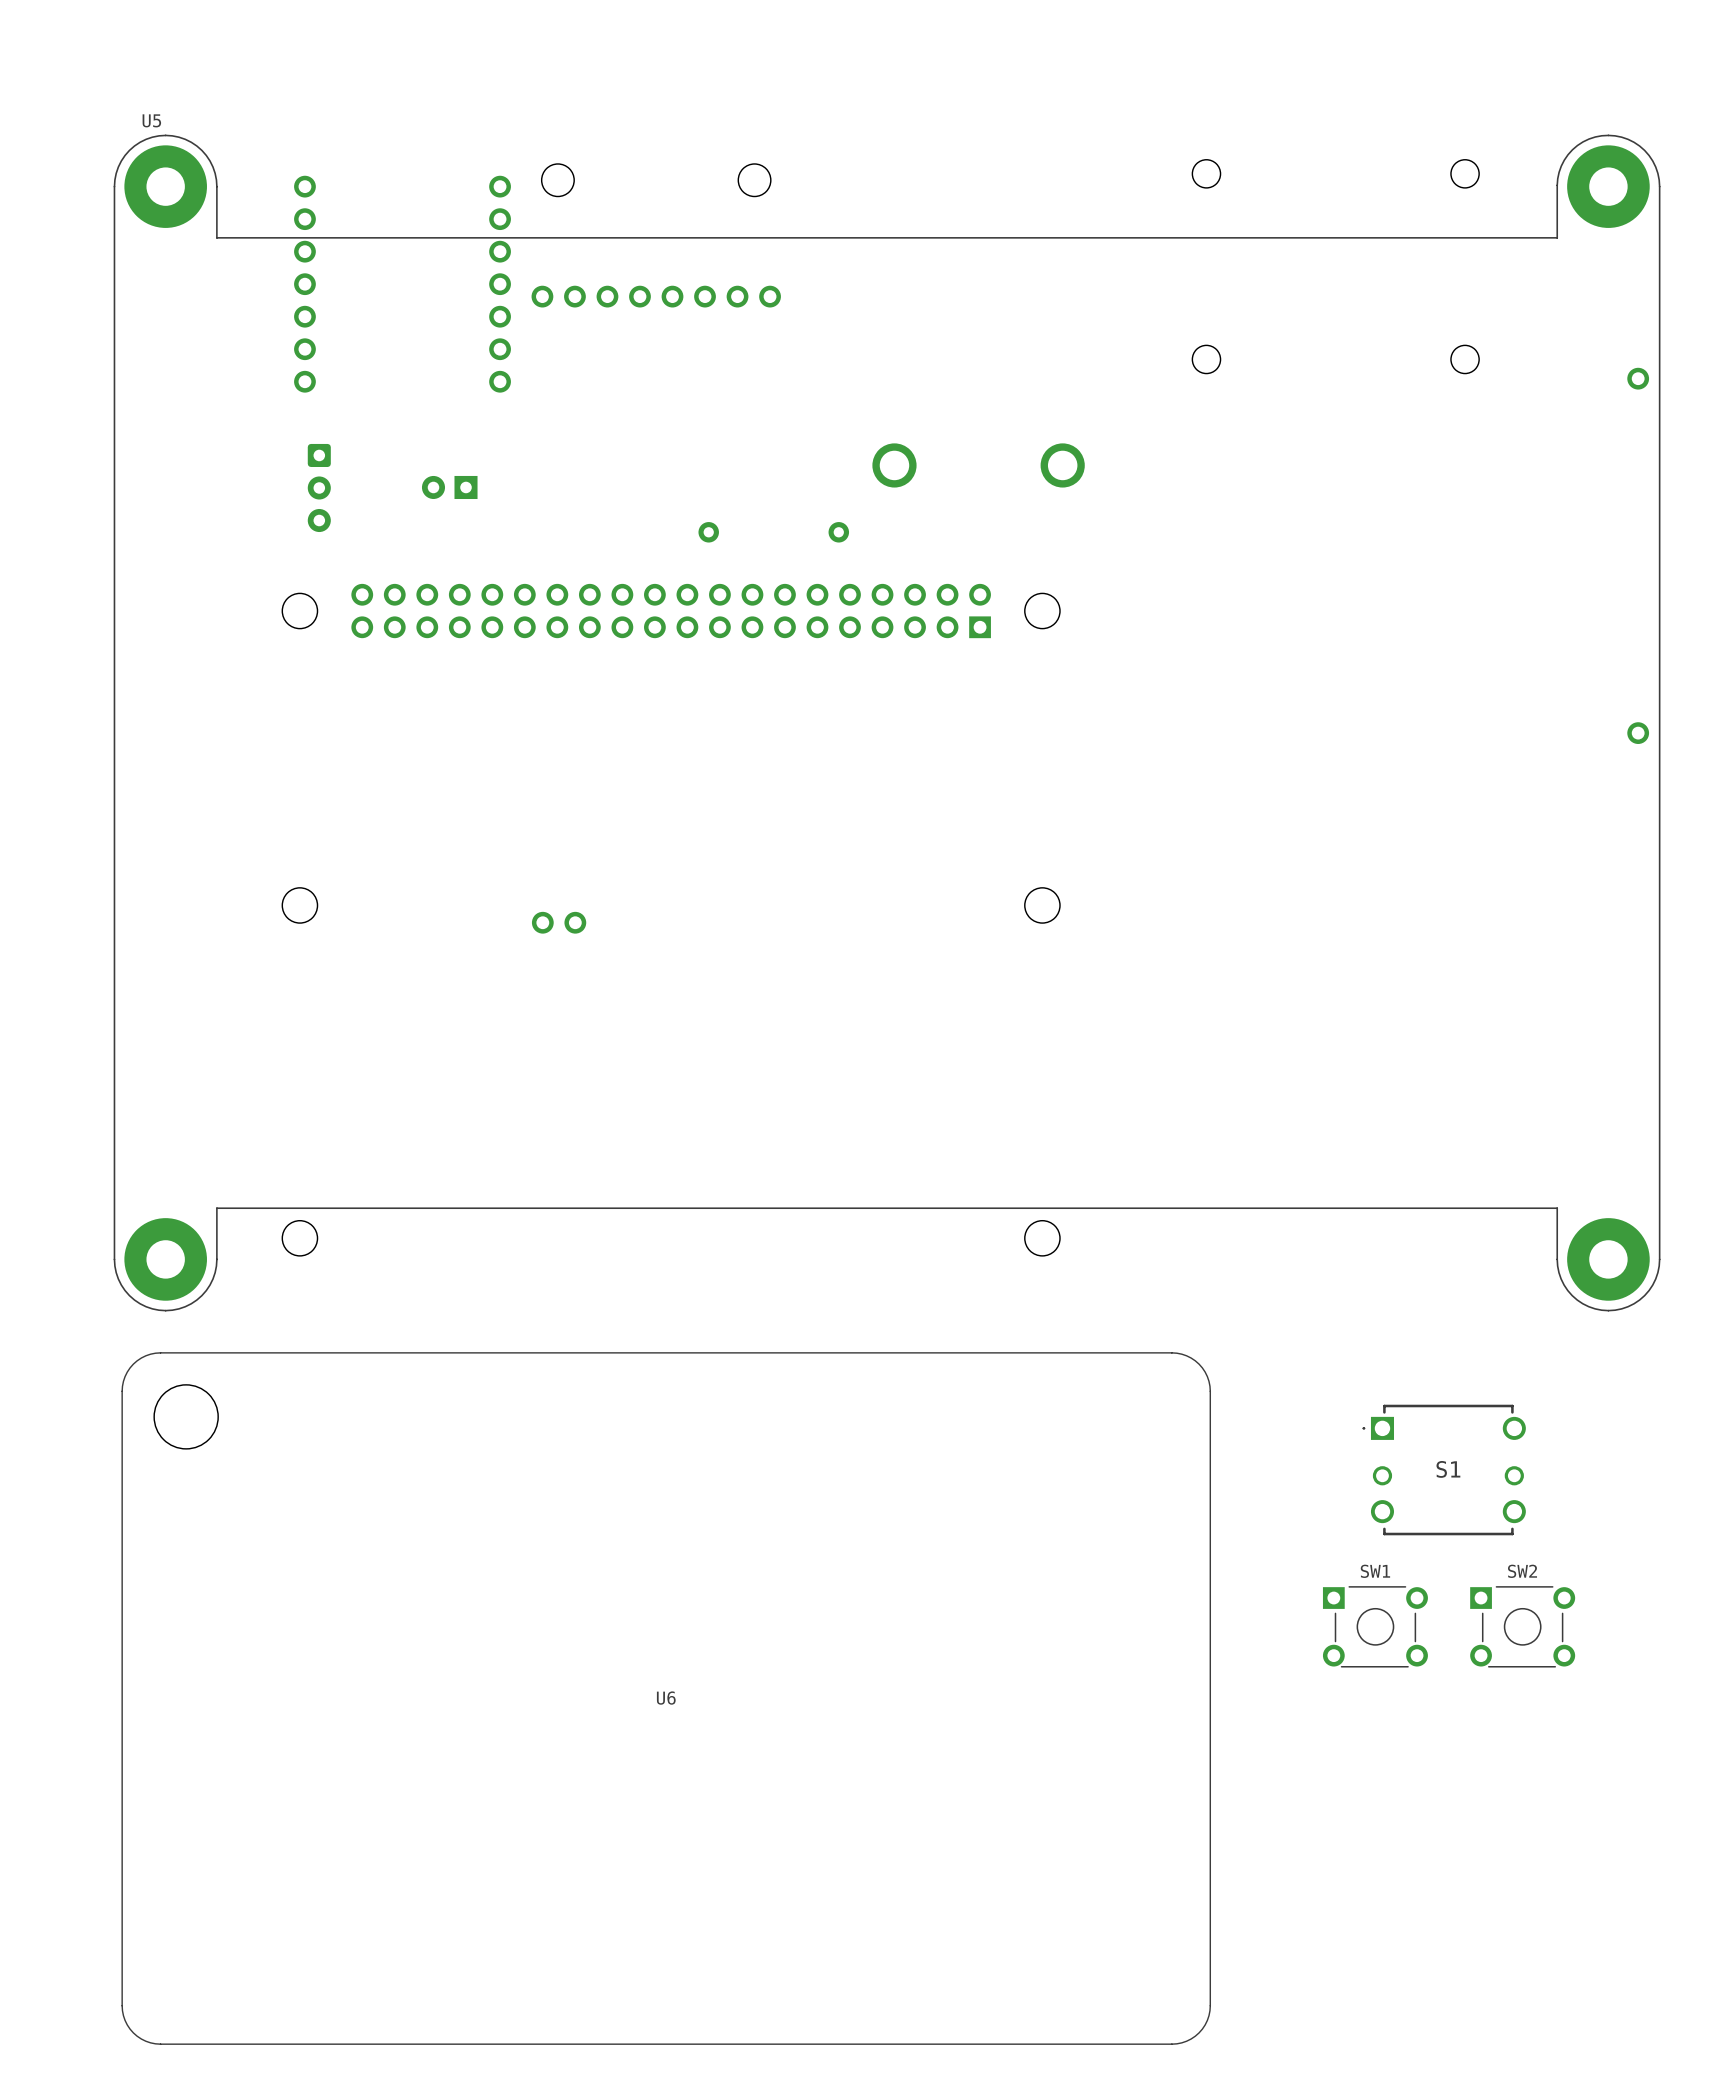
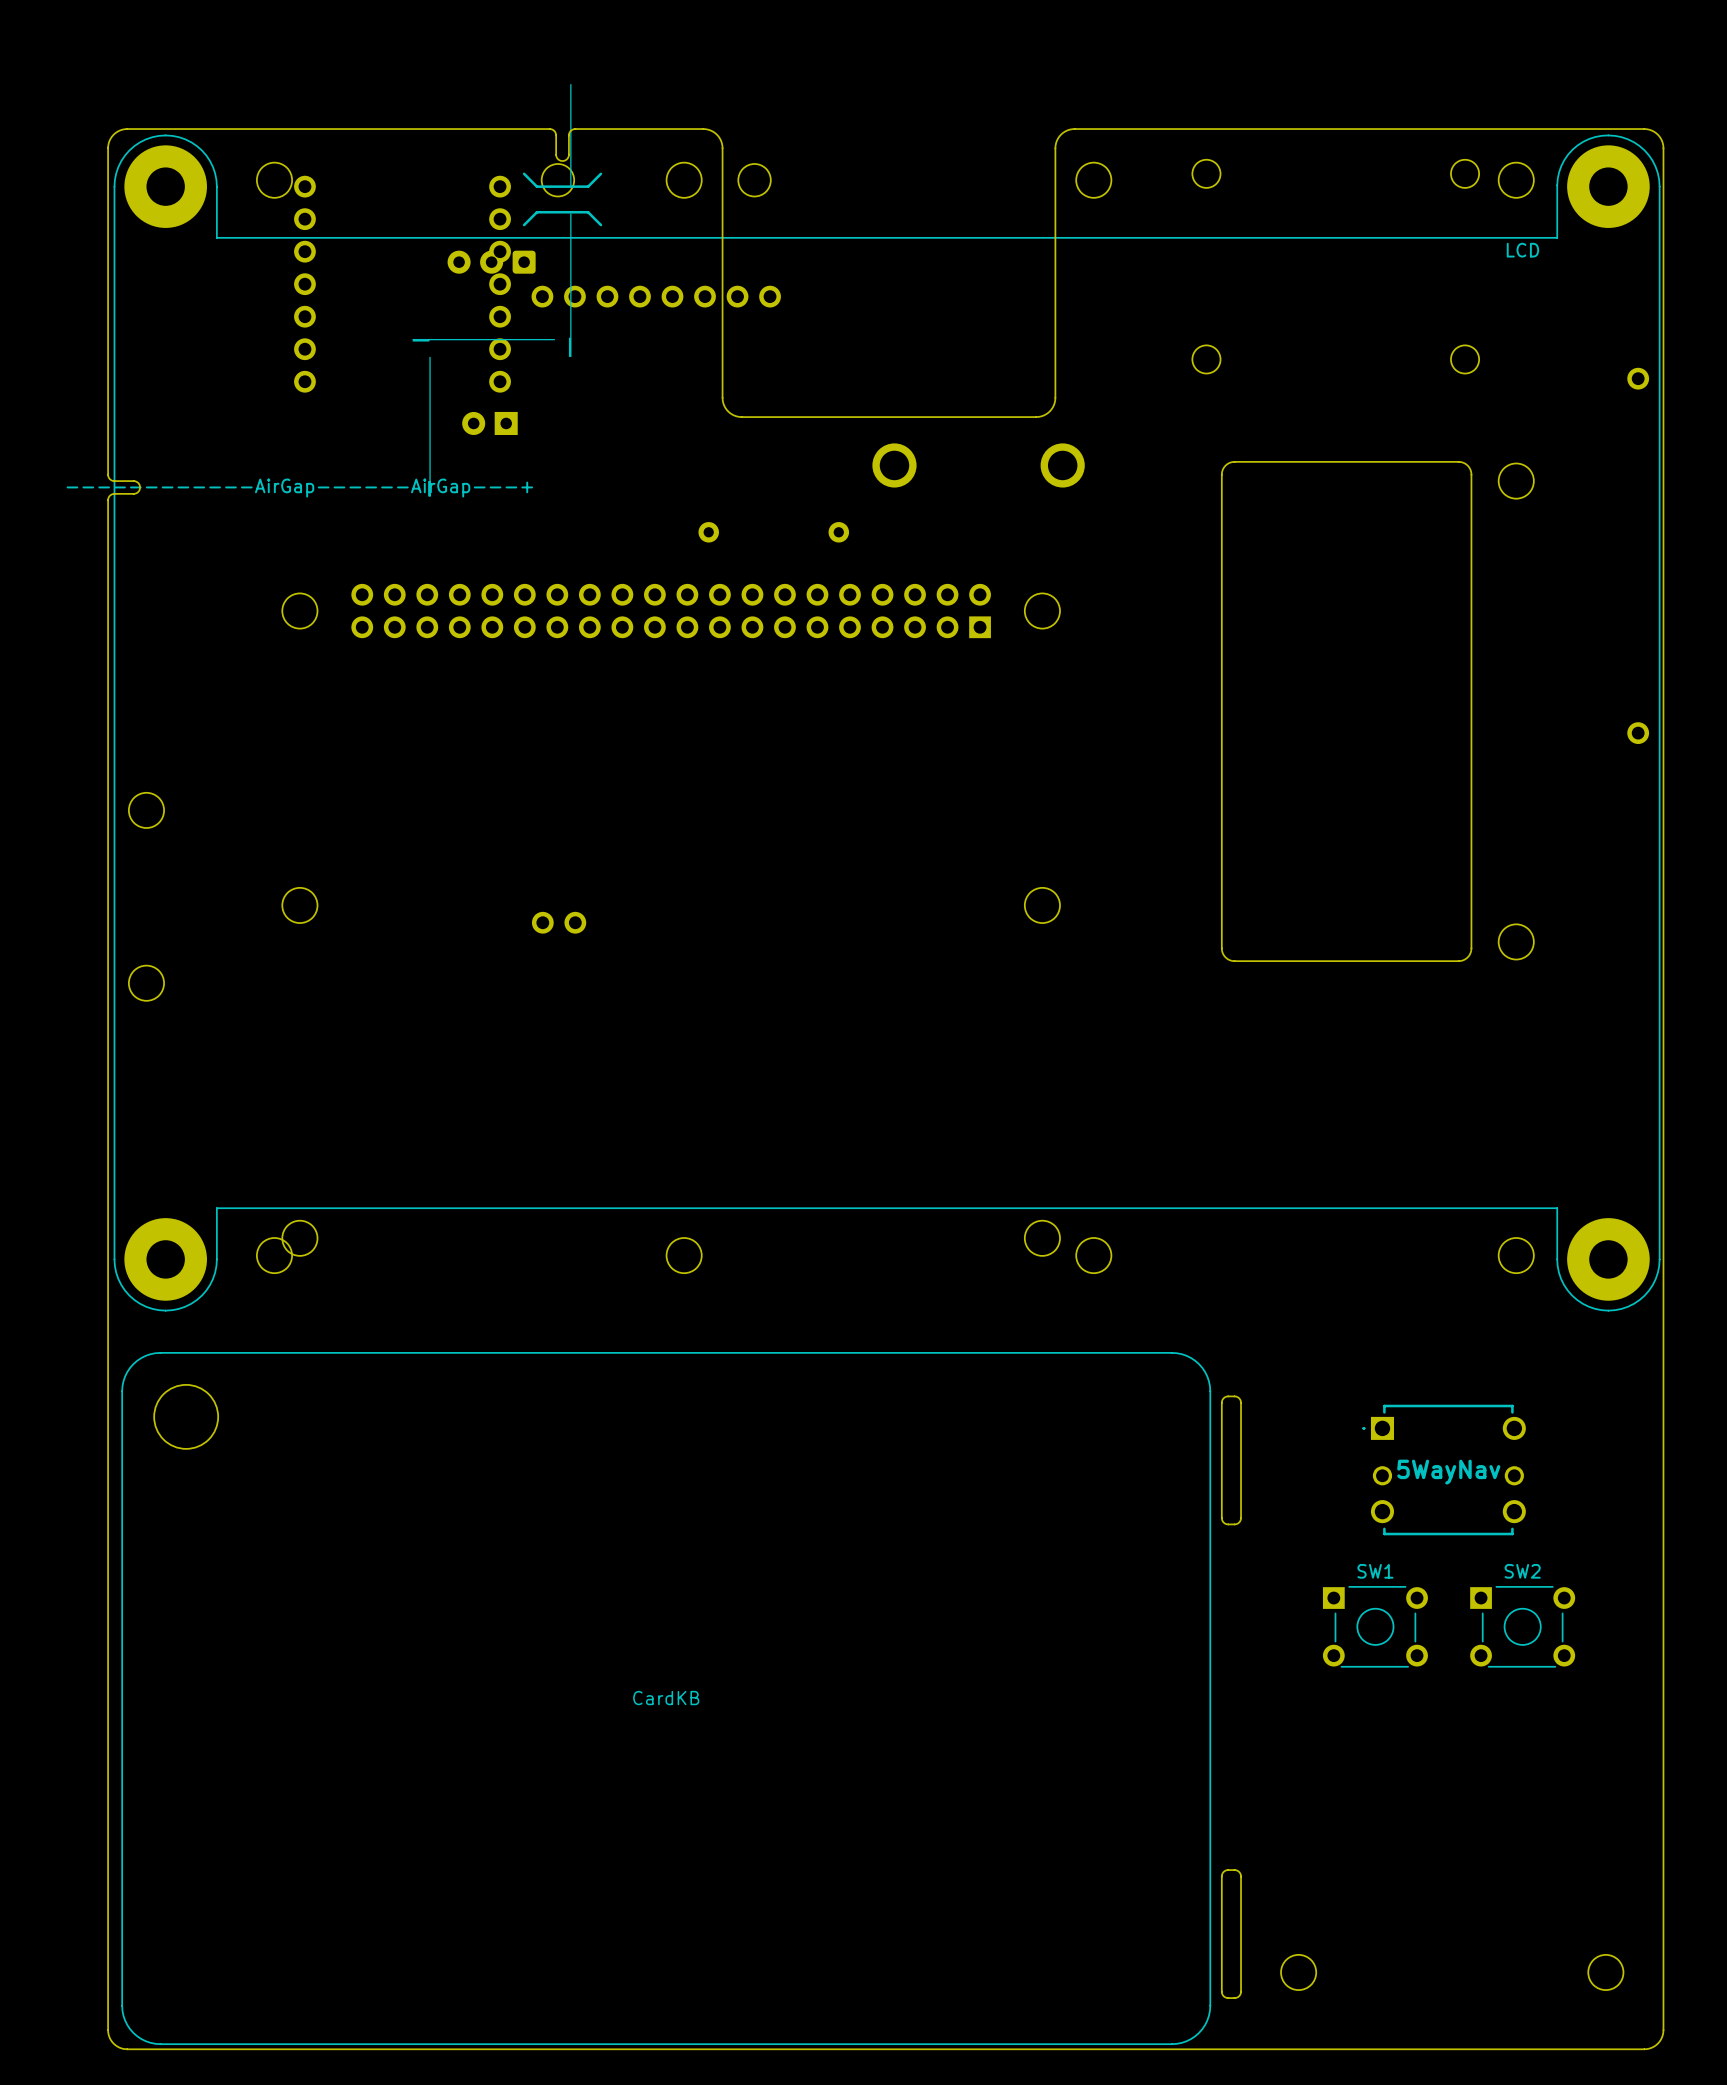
drawing: none -> [570, 84, 572, 187]
U5 name: U5 (151, 120) -> LCD (1522, 250)
board edge: none -> (127, 129) (550, 129) (555, 133) (556, 157) (562, 161) (568, 157) (568, 134) (573, 129) (710, 130) (718, 136) (722, 148) (722, 400) (730, 413) (741, 417) (1036, 417) (1047, 413) (1053, 405) (1055, 397) (1055, 145) (1061, 134) (1069, 129) (1644, 129) (1651, 130) (1659, 136) (1663, 148) (1663, 2030) (1660, 2039) (1655, 2045) (1644, 2049) (127, 2049) (117, 2046) (112, 2041) (108, 2030) (108, 500) (112, 494) (136, 493) (140, 487) (136, 481) (112, 480) (108, 475) (108, 148) (113, 134) (127, 129)
round board edge: none -> [256, 162, 293, 199]
round board edge: none -> [666, 162, 703, 199]
round board edge: none -> [1075, 162, 1112, 199]
round board edge: none -> [1498, 162, 1535, 199]
line: none -> (524, 173) (536, 186) (588, 186) (600, 173)
drawing: none -> [412, 213, 572, 497]
line: none -> (524, 225) (536, 212) (588, 212) (600, 225)
board edge: none -> (1234, 461) (1458, 461) (1465, 463) (1470, 469) (1471, 948) (1469, 955) (1464, 959) (1234, 961) (1227, 959) (1223, 953) (1221, 474) (1225, 465) (1234, 461)
round board edge: none -> [1498, 463, 1535, 500]
text: none -> ------------AirGap------AirGap---+ (299, 488)
part rotation: 0° (319, 487) -> 90° clockwise (491, 262)
part position: (319, 487) -> (491, 262)
part position: (449, 487) -> (489, 423)
round board edge: none -> [128, 792, 165, 829]
round board edge: none -> [1498, 924, 1535, 960]
round board edge: none -> [128, 965, 165, 1002]
round board edge: none -> [256, 1237, 293, 1274]
round board edge: none -> [666, 1237, 703, 1274]
round board edge: none -> [1075, 1237, 1112, 1274]
round board edge: none -> [1498, 1237, 1535, 1274]
board edge: none -> (1228, 1396) (1237, 1397) (1241, 1402) (1241, 1518) (1239, 1522) (1234, 1524) (1225, 1523) (1221, 1518) (1221, 1402) (1223, 1398) (1228, 1396)
S1 name: S1 (1448, 1469) -> 5WayNav (1448, 1472)
U6 name: U6 (666, 1698) -> CardKB (666, 1698)
board edge: none -> (1228, 1870) (1237, 1870) (1241, 1876) (1241, 1991) (1239, 1996) (1234, 1998) (1225, 1997) (1221, 1991) (1221, 1876) (1223, 1871) (1228, 1870)
round board edge: none -> [1280, 1954, 1317, 1991]
round board edge: none -> [1587, 1954, 1624, 1991]

